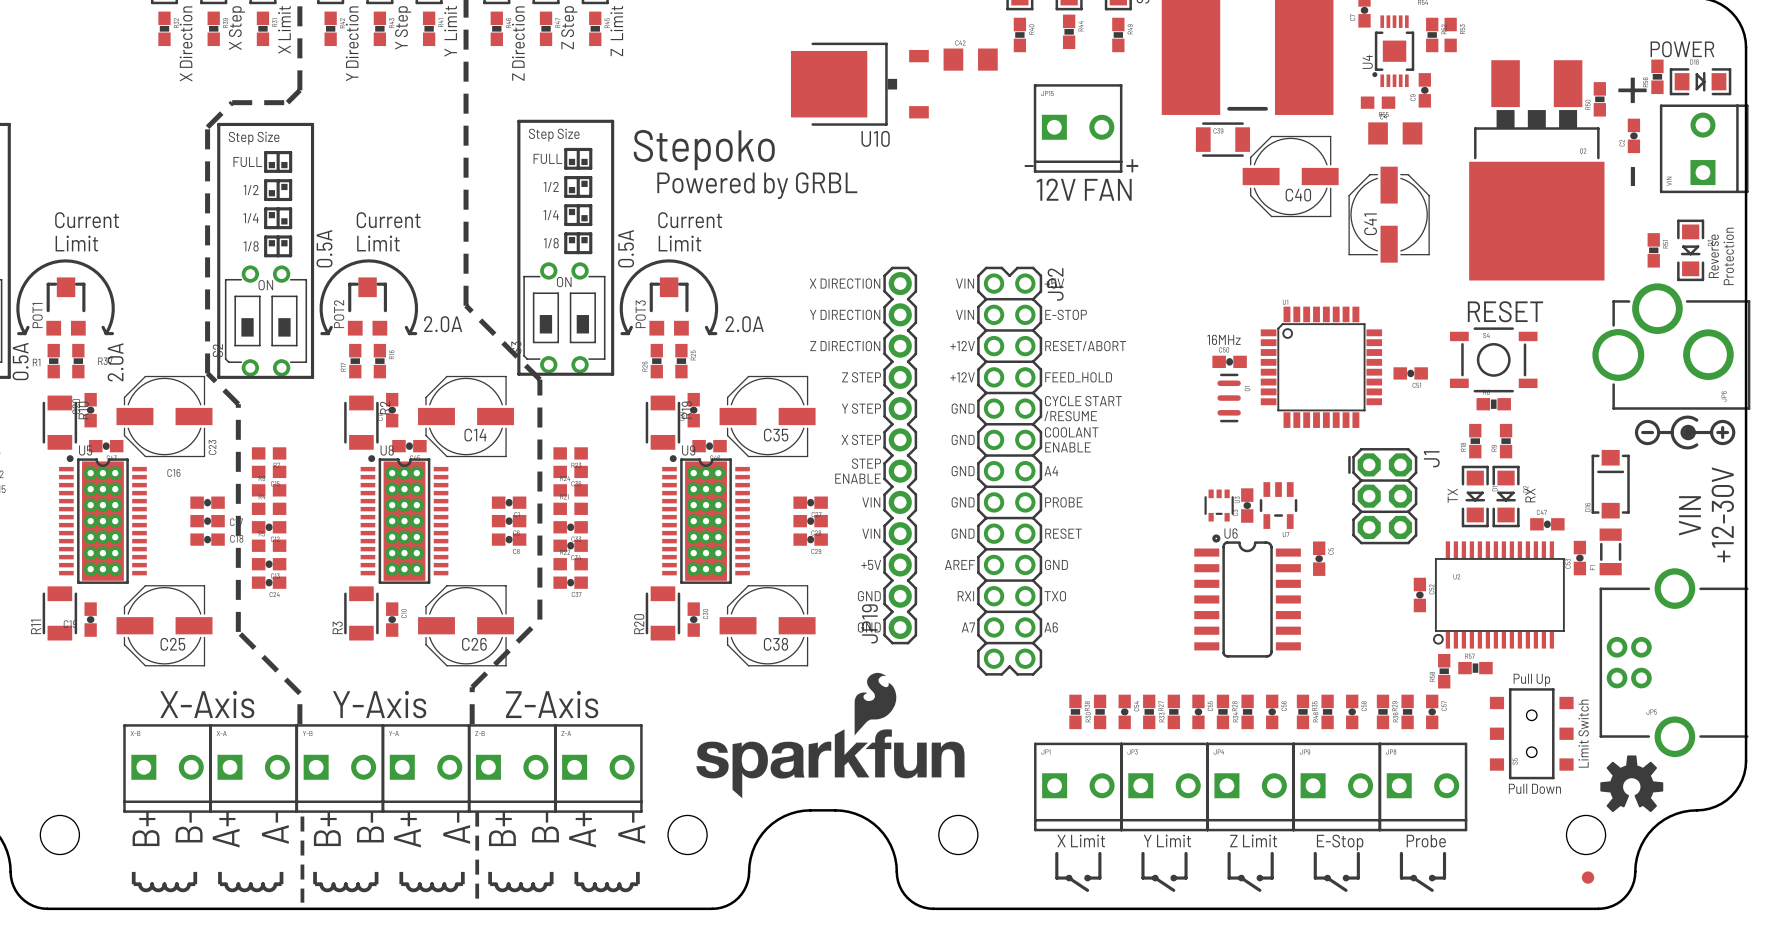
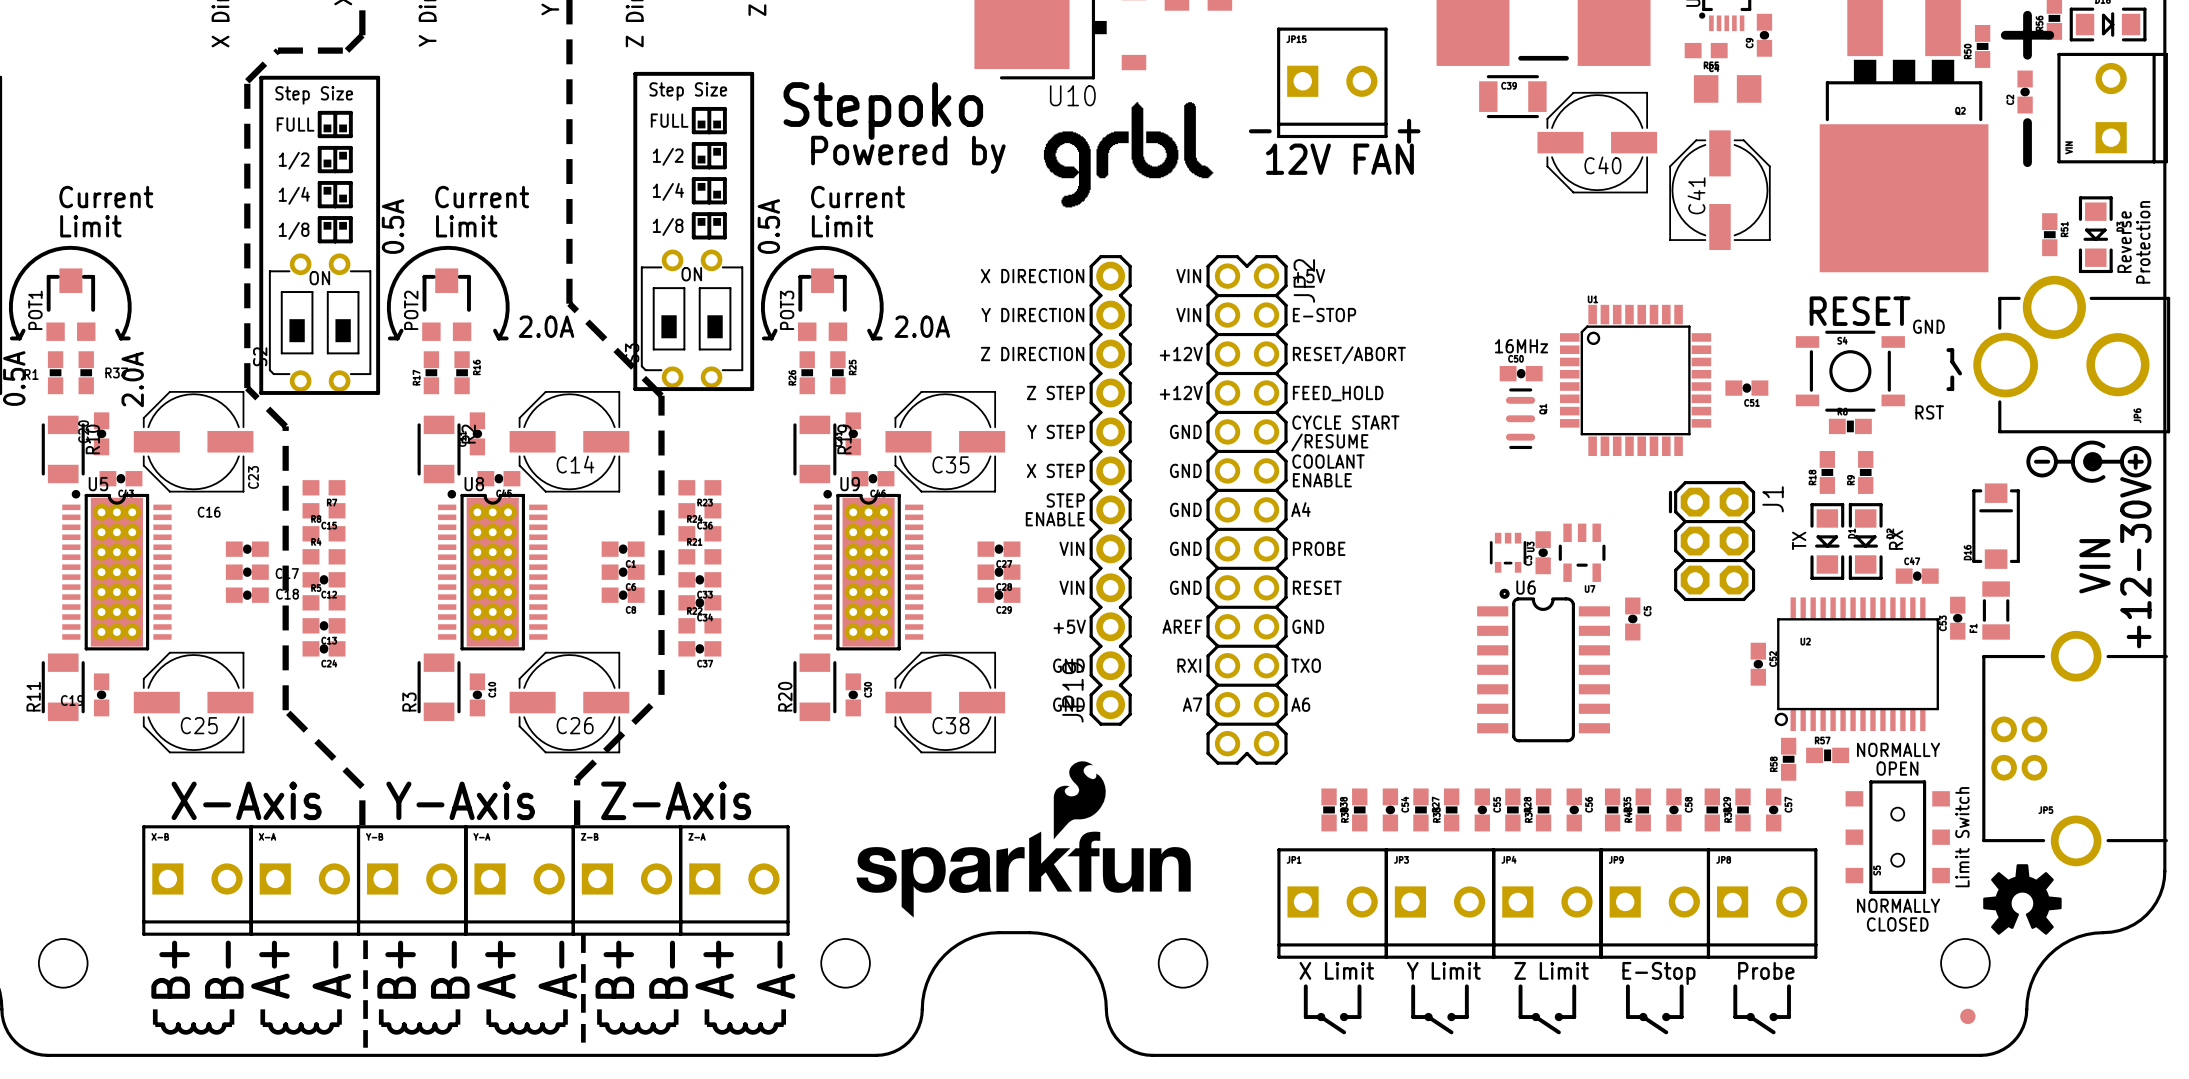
drawing: none -> [1043, 102, 1214, 208]
text: Powered by GRBL (757, 185) -> Powered by (908, 154)
text: none -> GND (1928, 326)
line: none -> (1948, 350) (1952, 350) (1952, 361) (1960, 373)
line: none -> (1952, 377) (1952, 389) (1948, 389)
text: none -> RST (1929, 412)
text: none -> NORMALLY (1898, 749)
text: Pull Up (1531, 680) -> OPEN (1897, 768)
text: Pull Down (1534, 788) -> NORMALLY (1898, 905)
text: none -> CLOSED (1897, 924)

